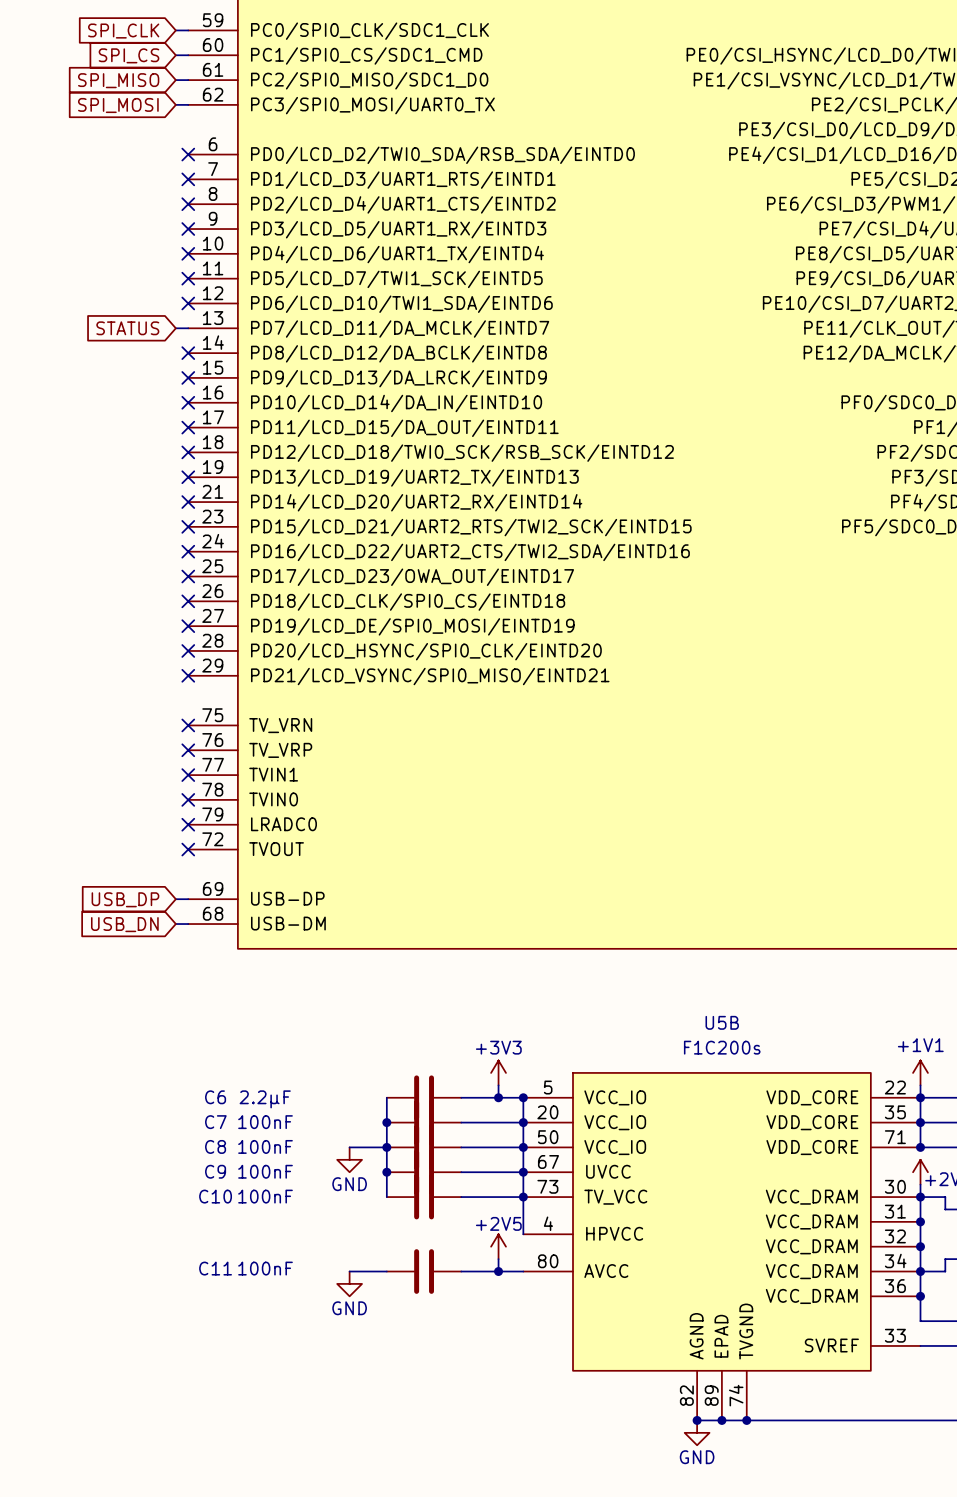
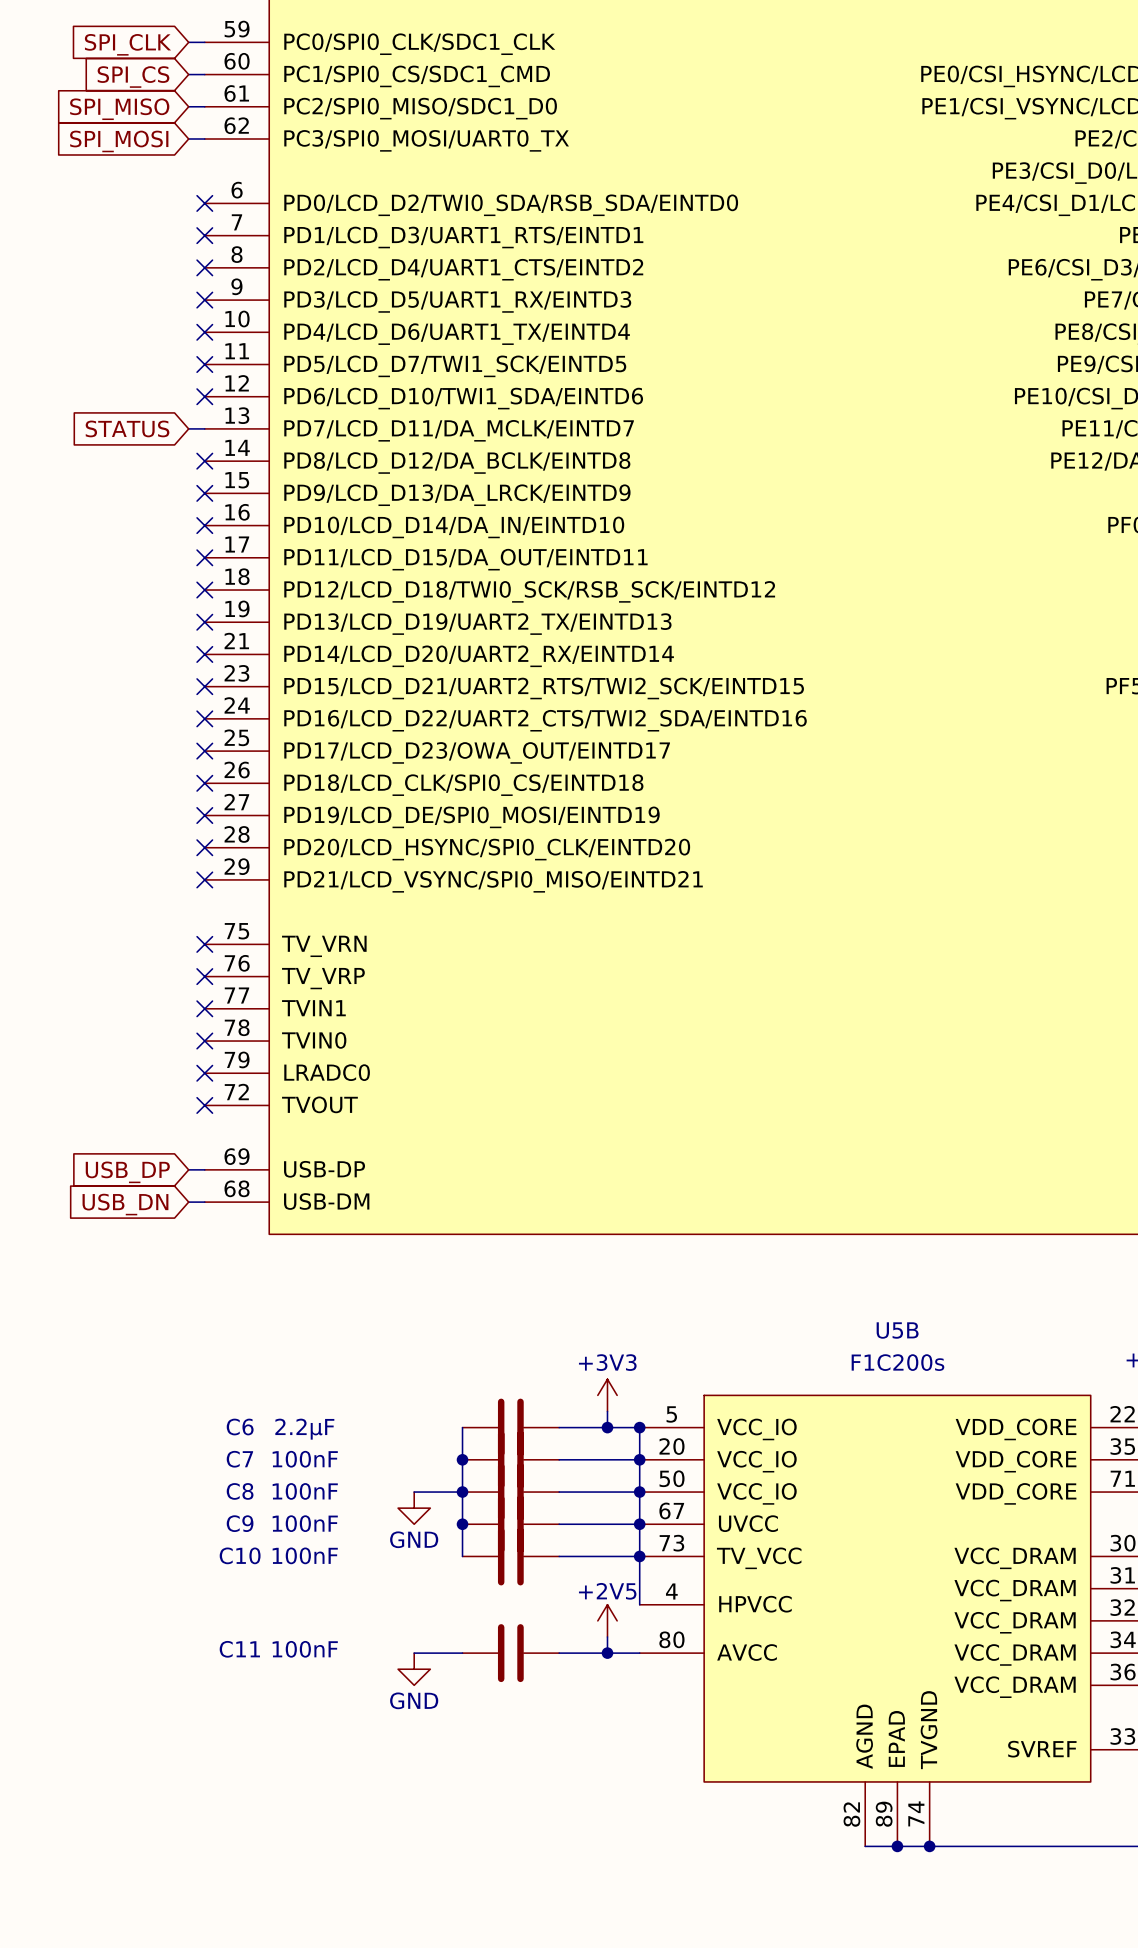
junction: (697, 1420) -> none
power symbol: GND (697, 1432) -> none

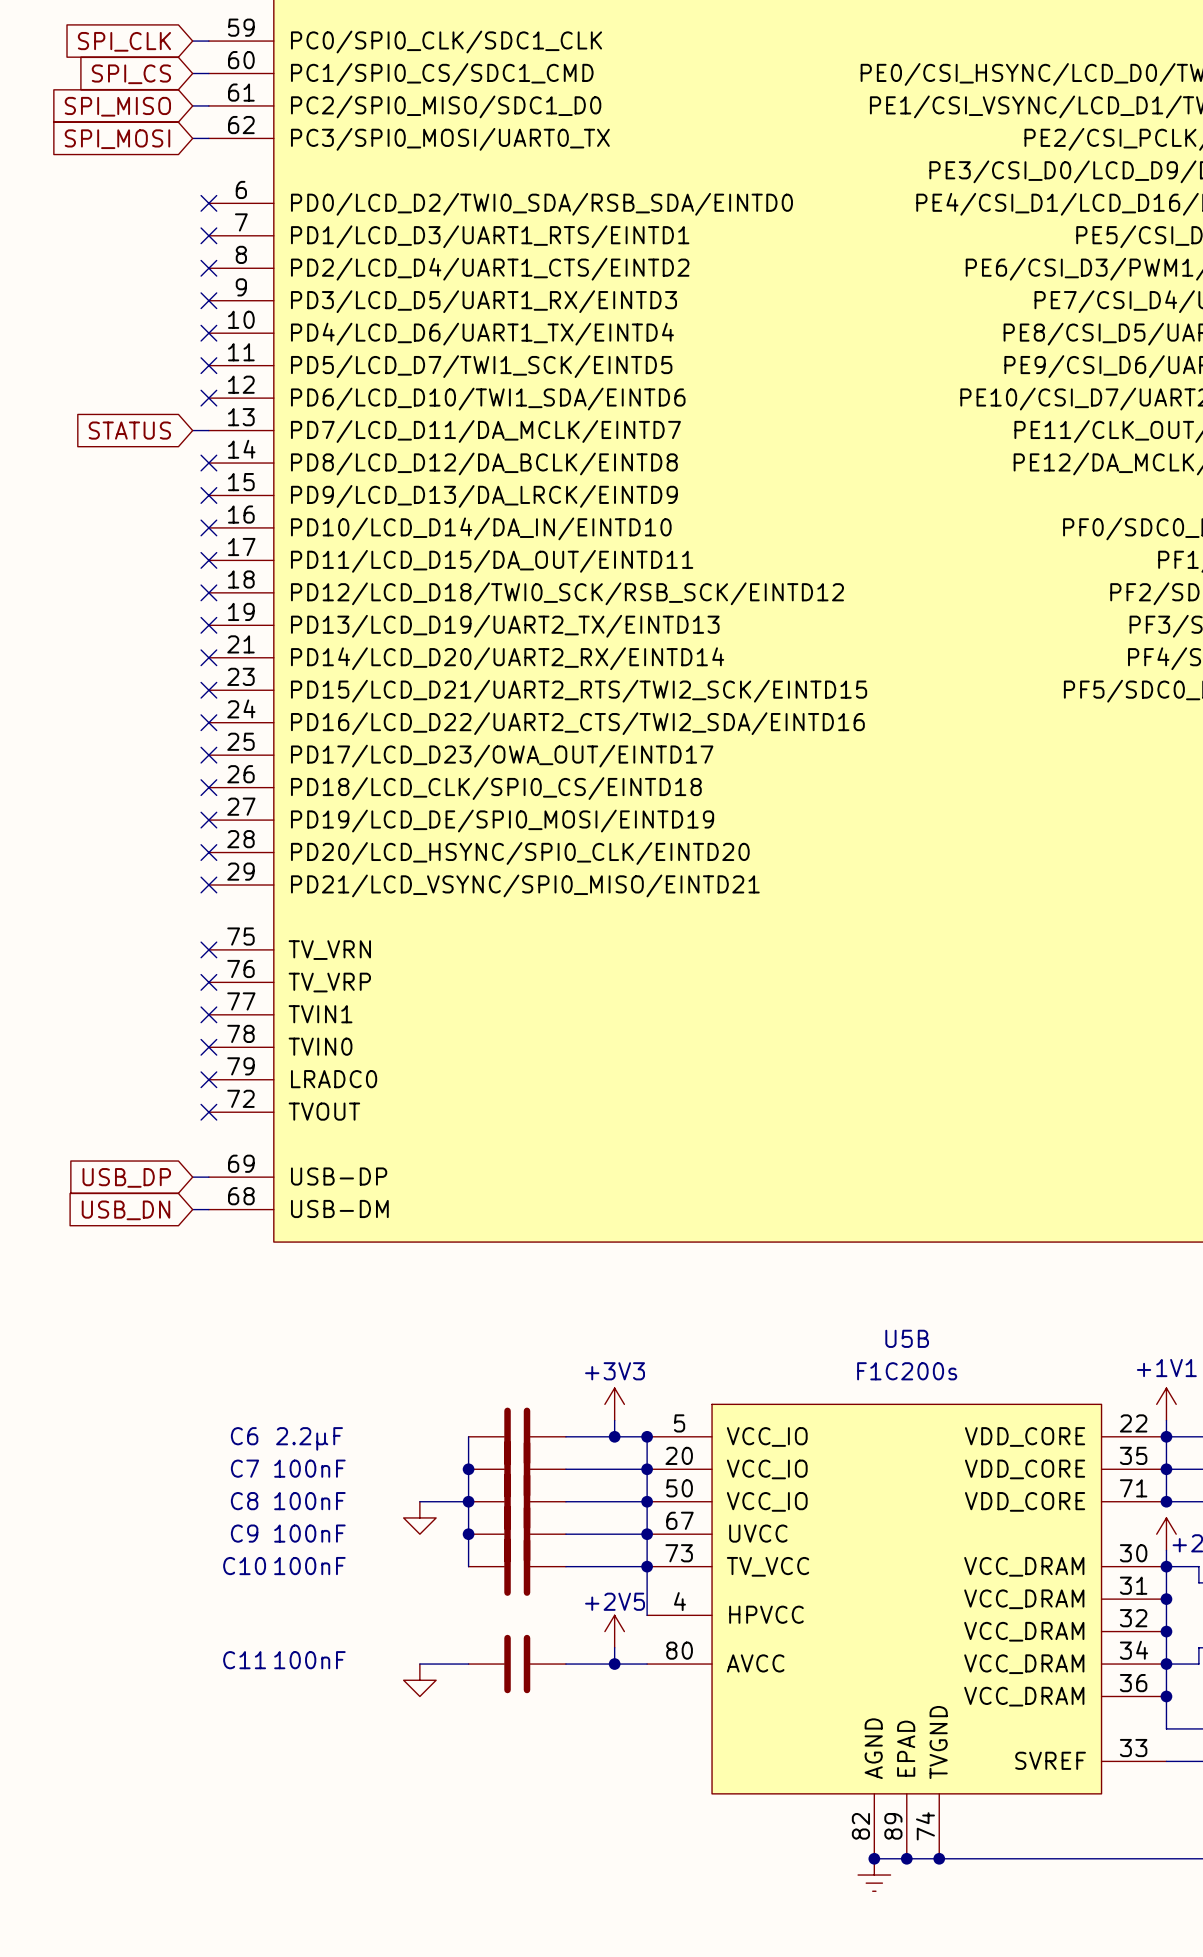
power symbol text: GND (414, 1539) -> none
power symbol text: GND (414, 1700) -> none
junction: none -> (874, 1858)
power symbol: none -> (874, 1875)

